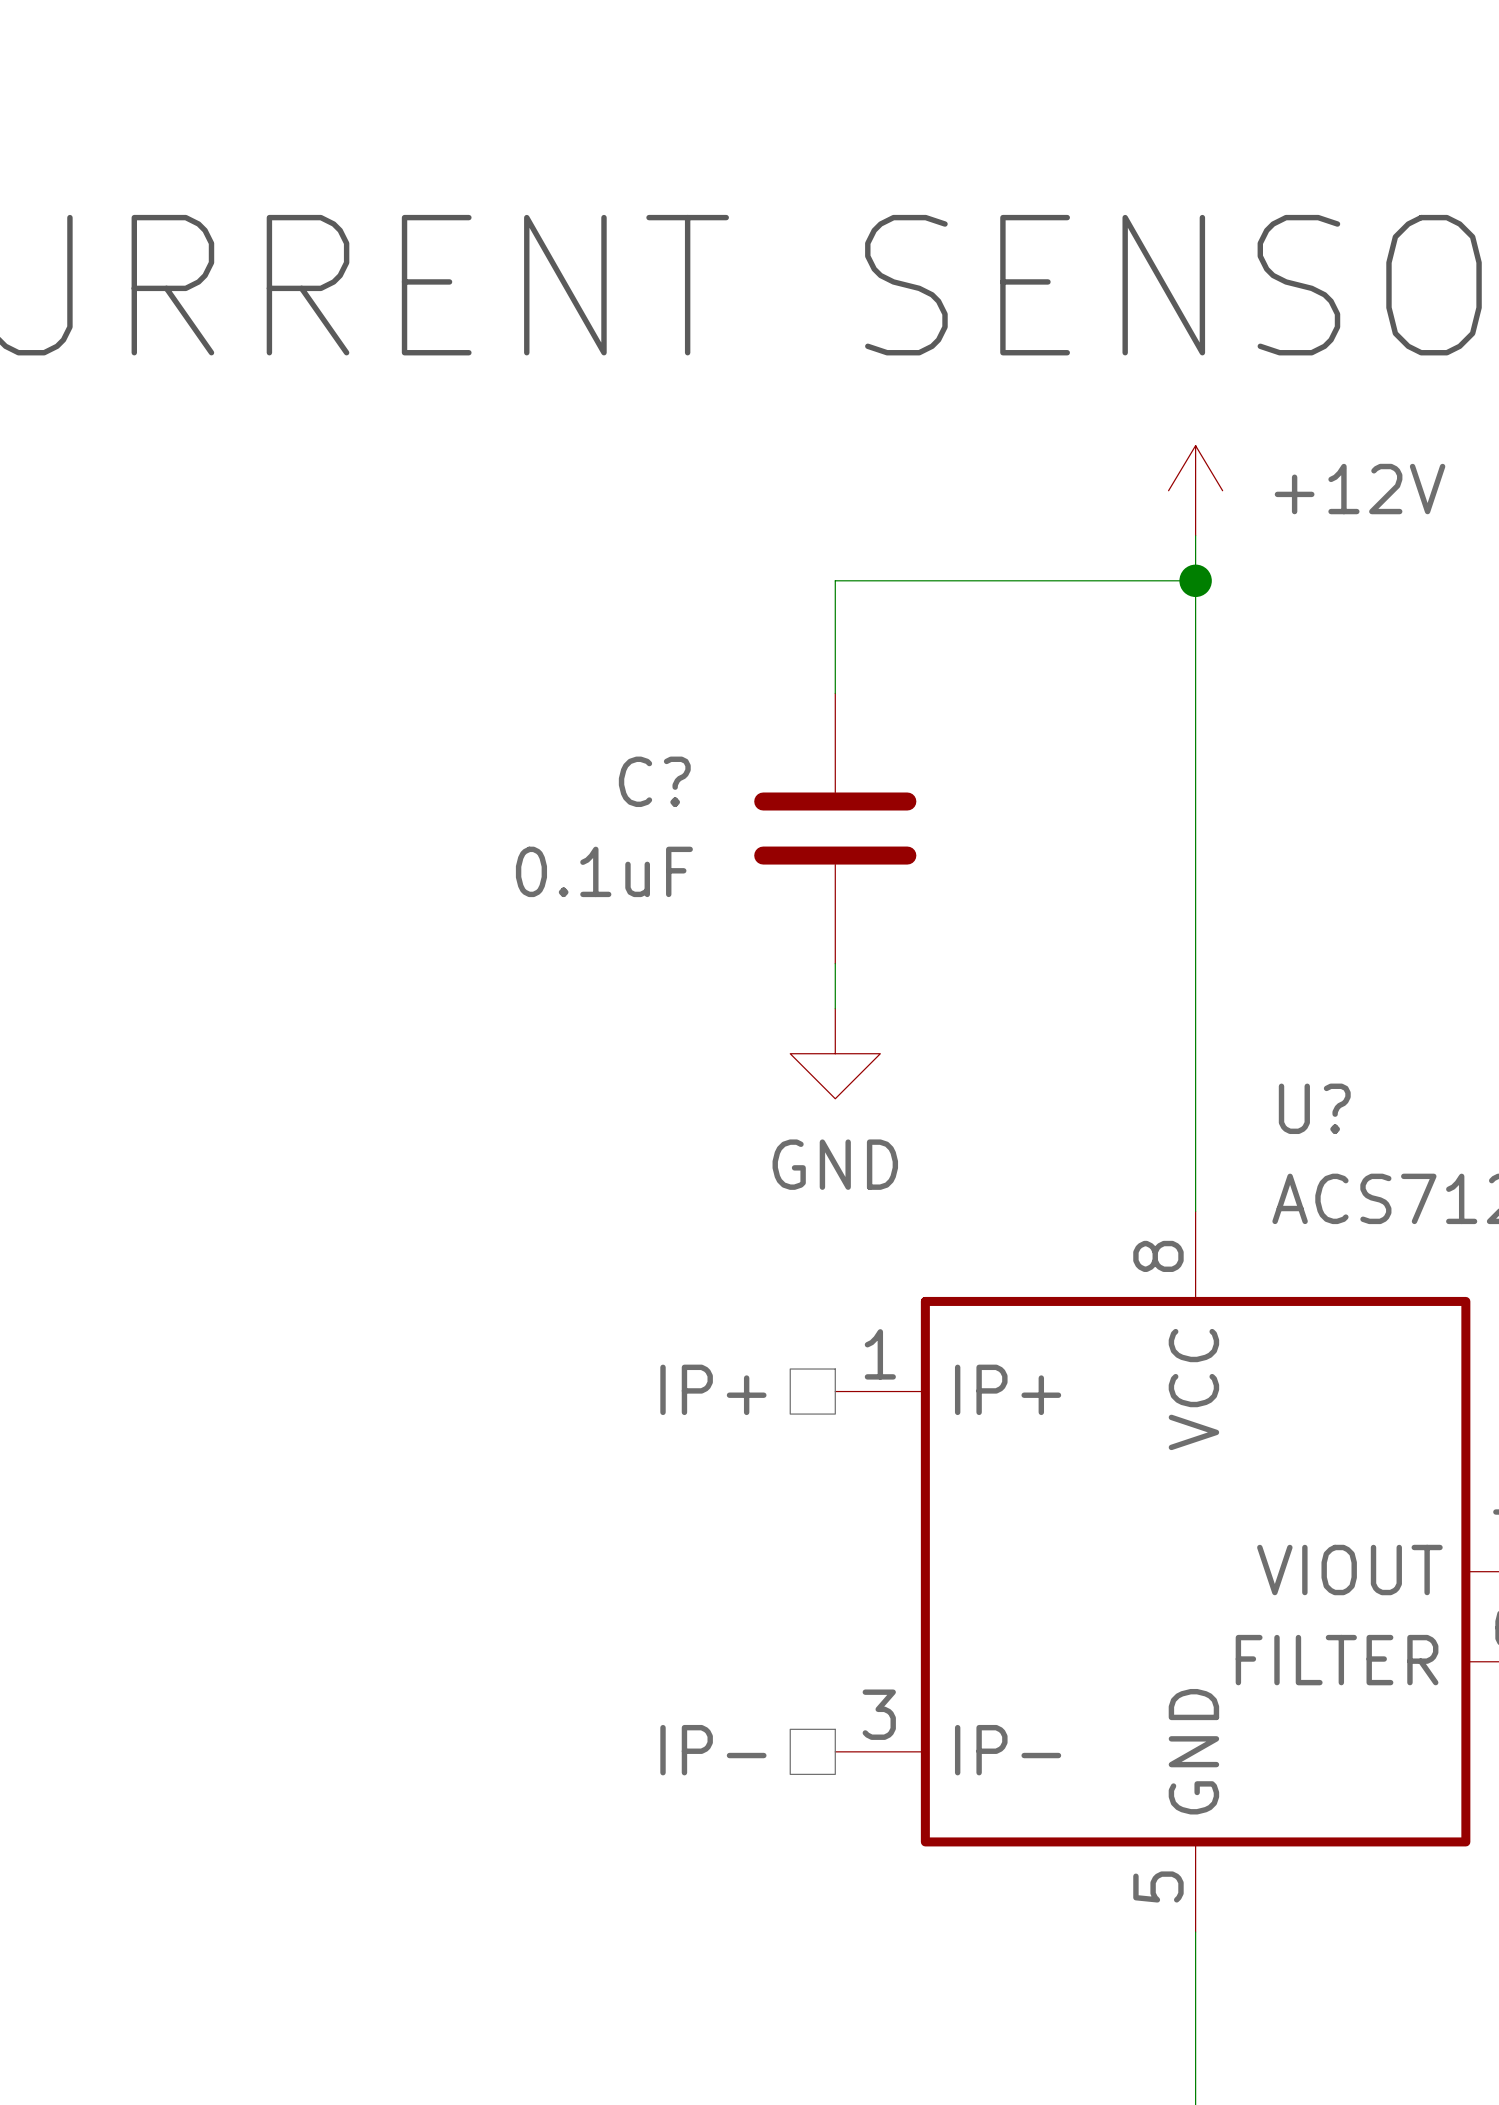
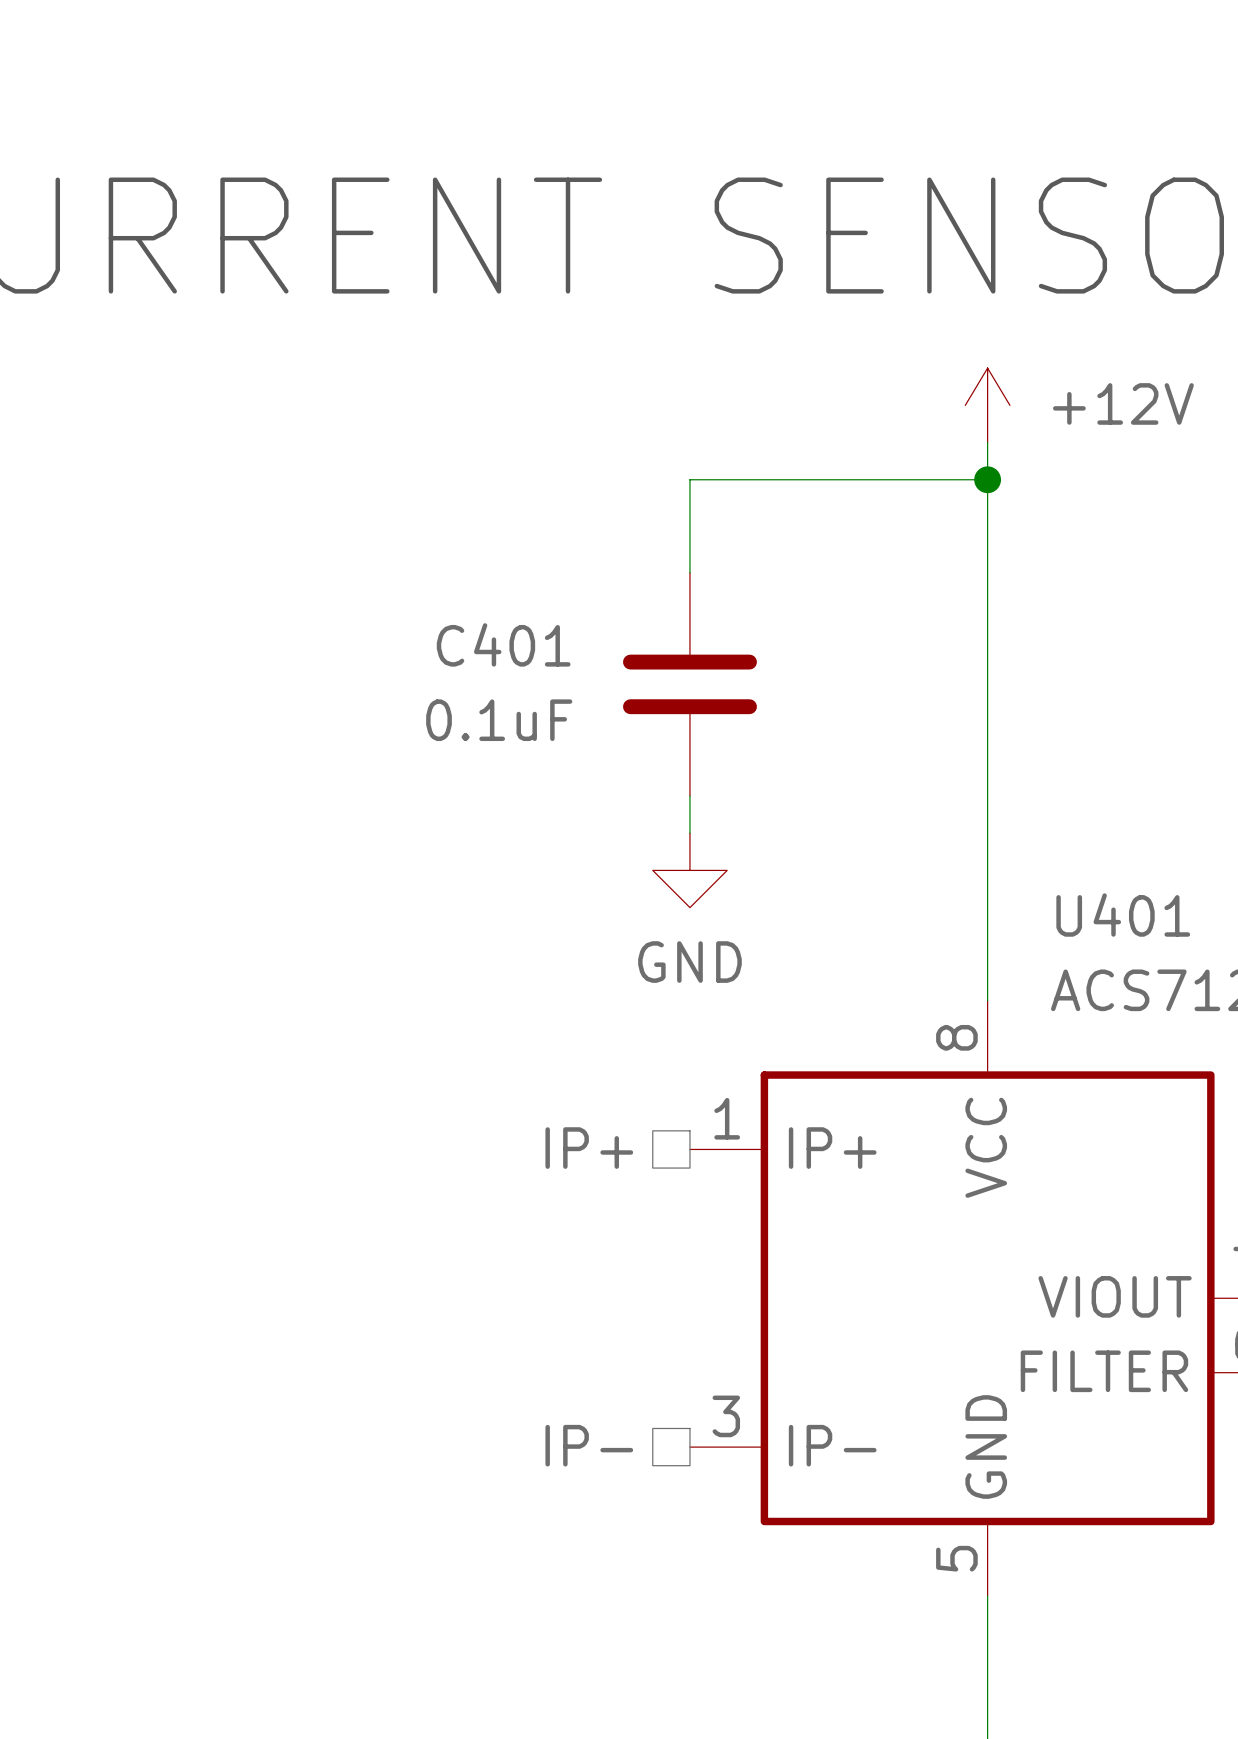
C? name: C? (654, 781) -> C401 (503, 644)
U? name: U? (1314, 1108) -> U401 (1123, 915)

